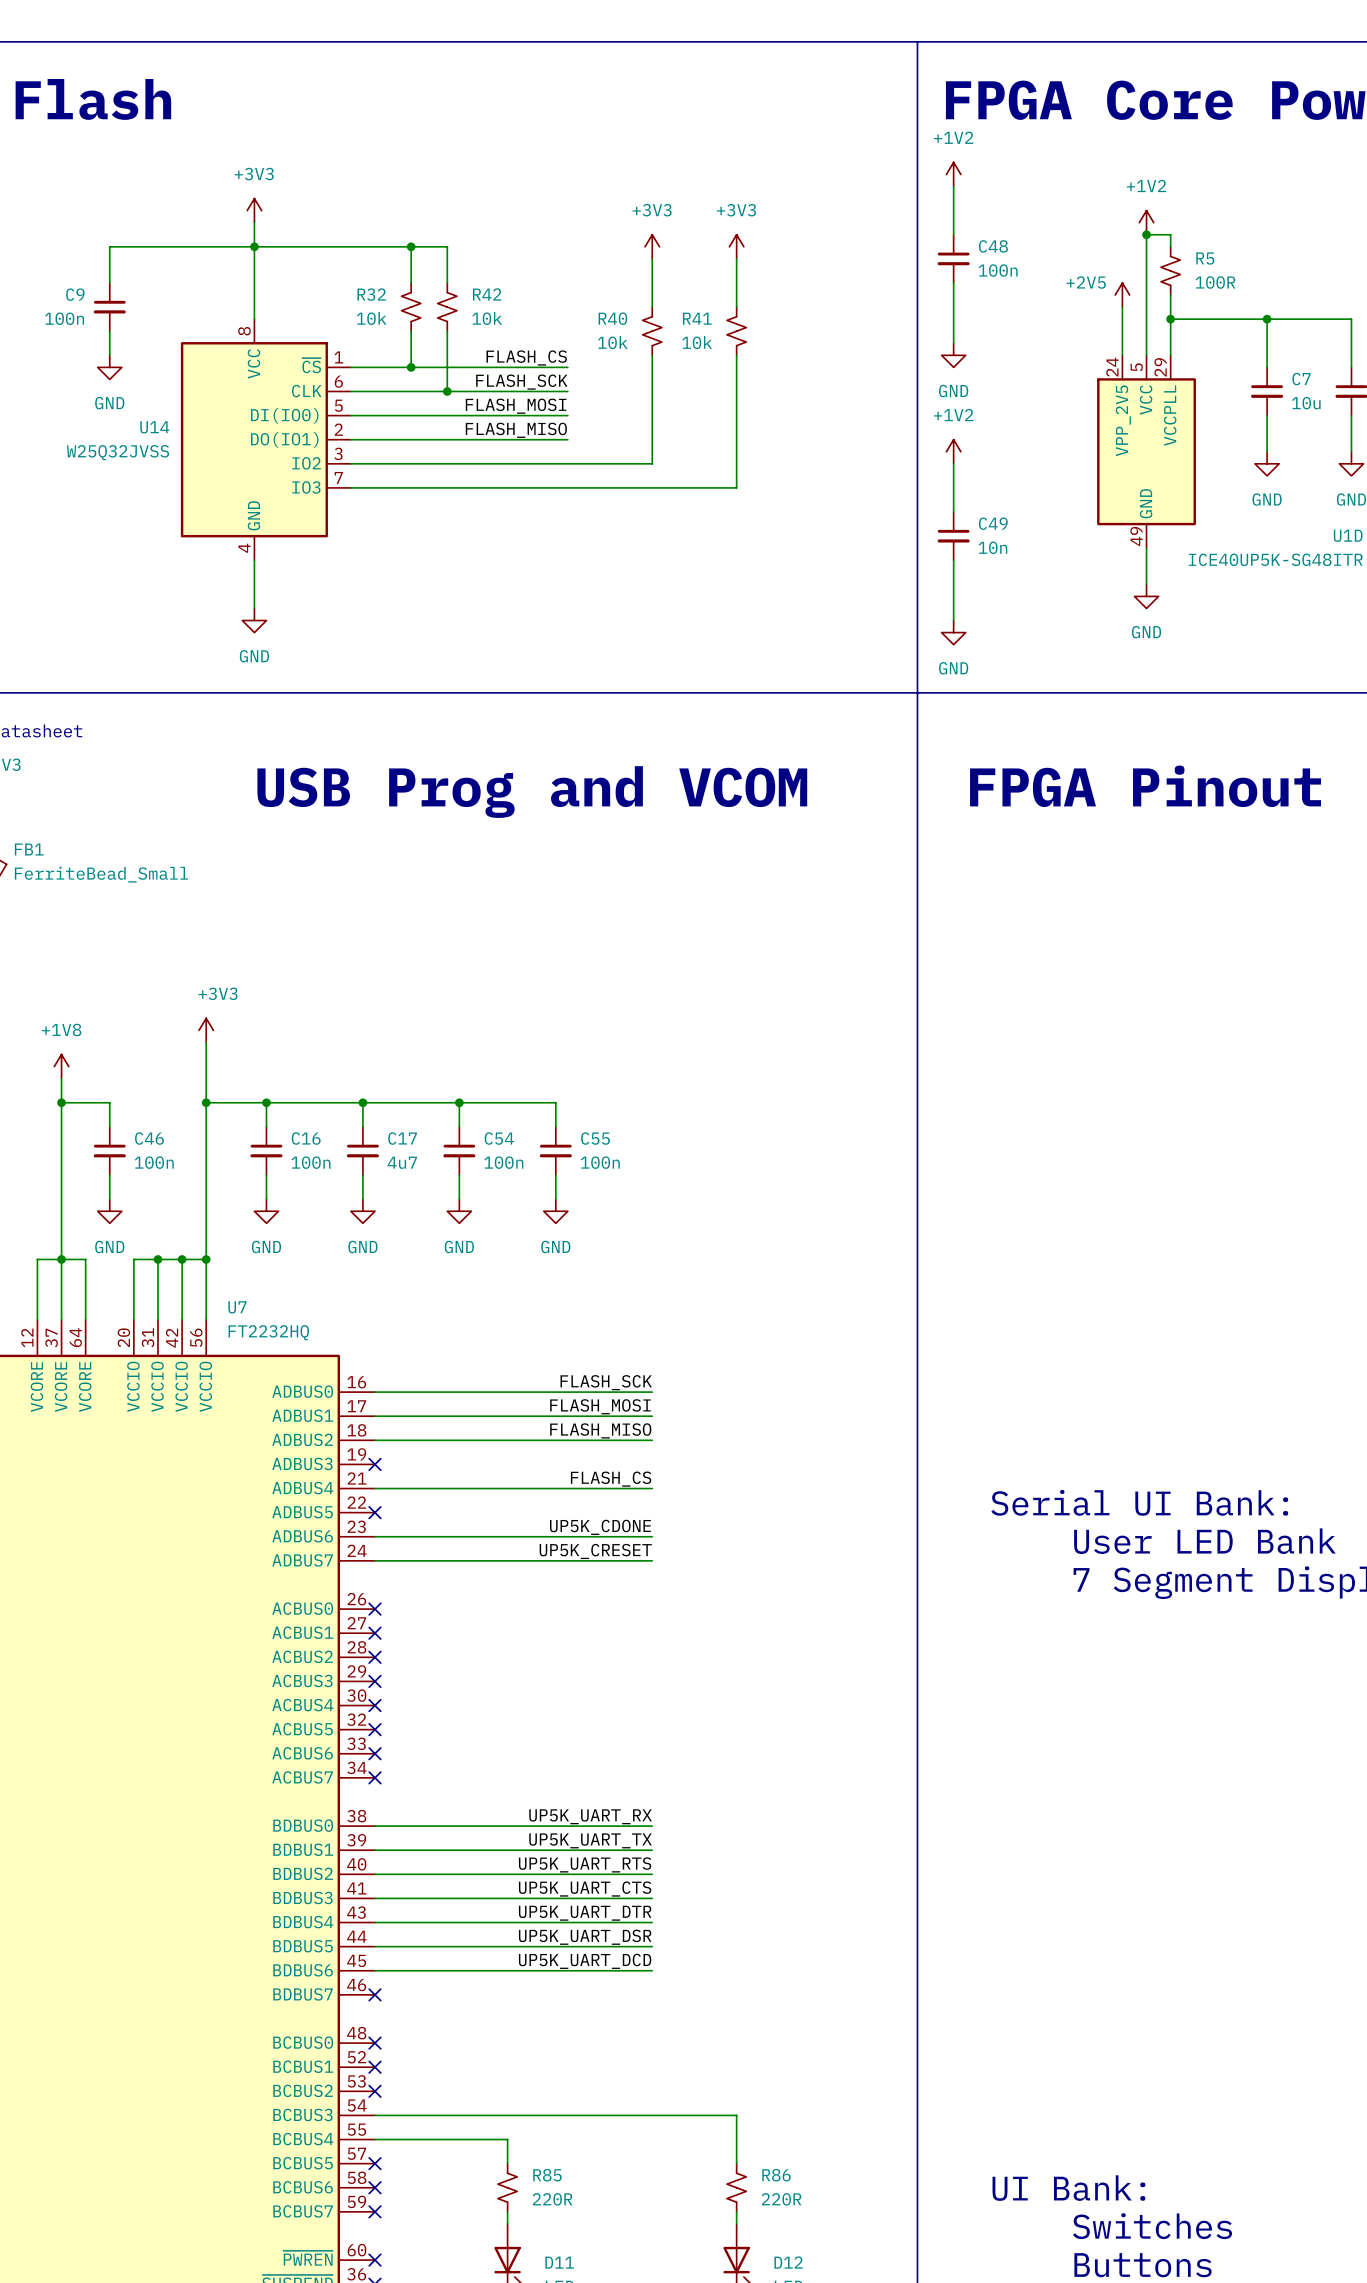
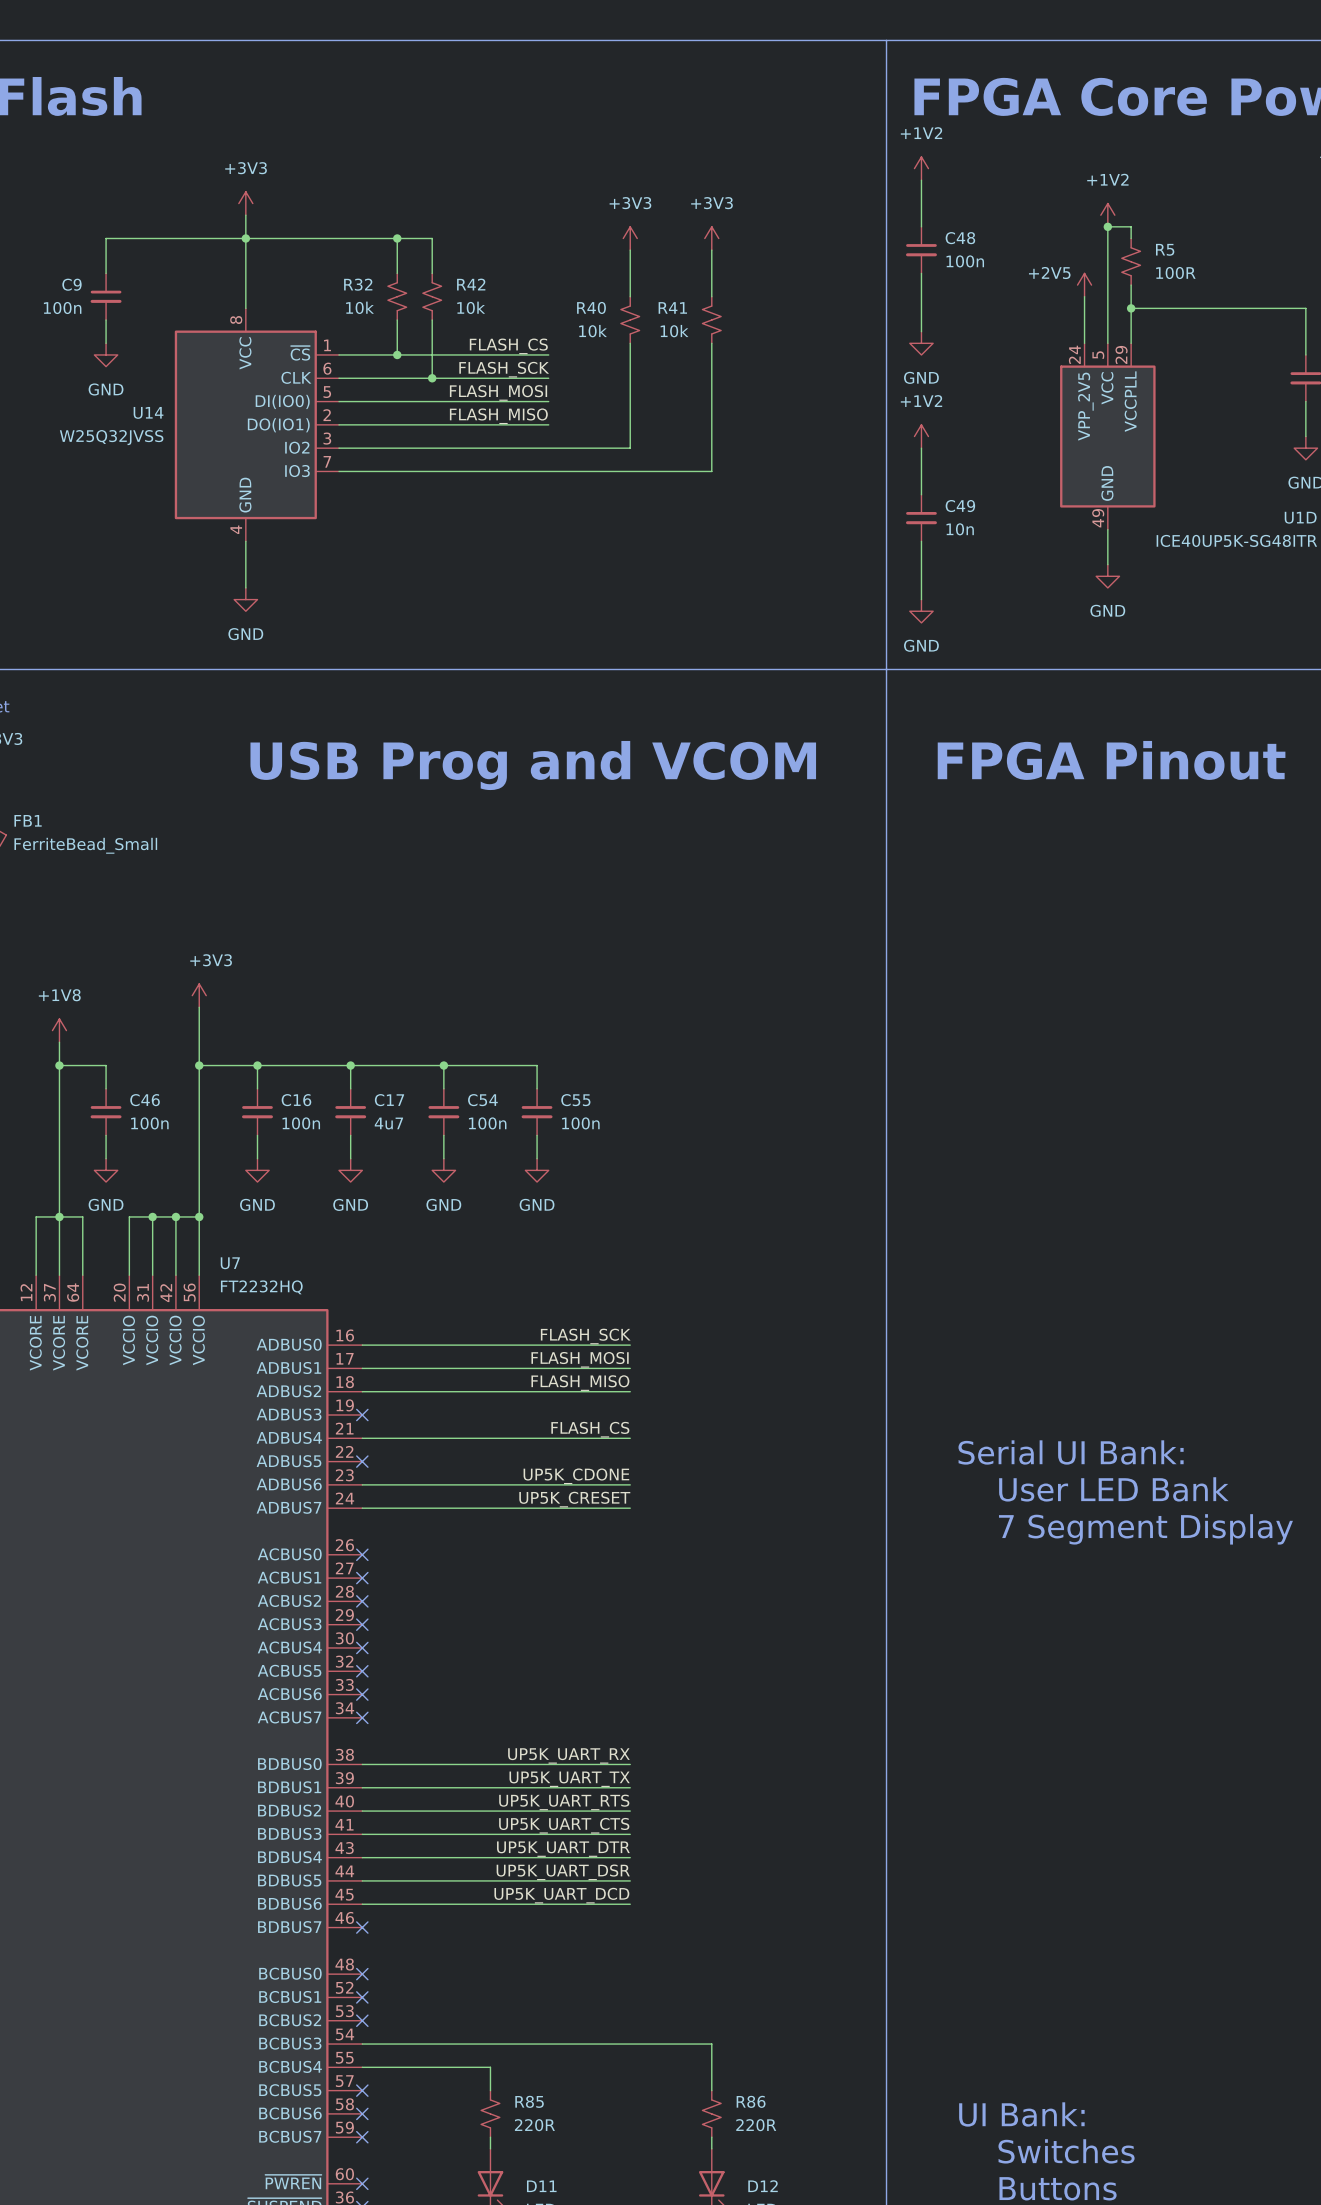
wire: (1267, 319) (1267, 367) -> none
junction: (1267, 319) -> none
C7: 10u (1267, 391) -> none
wire: (1267, 415) (1267, 451) -> none
power symbol: GND (1267, 463) -> none

